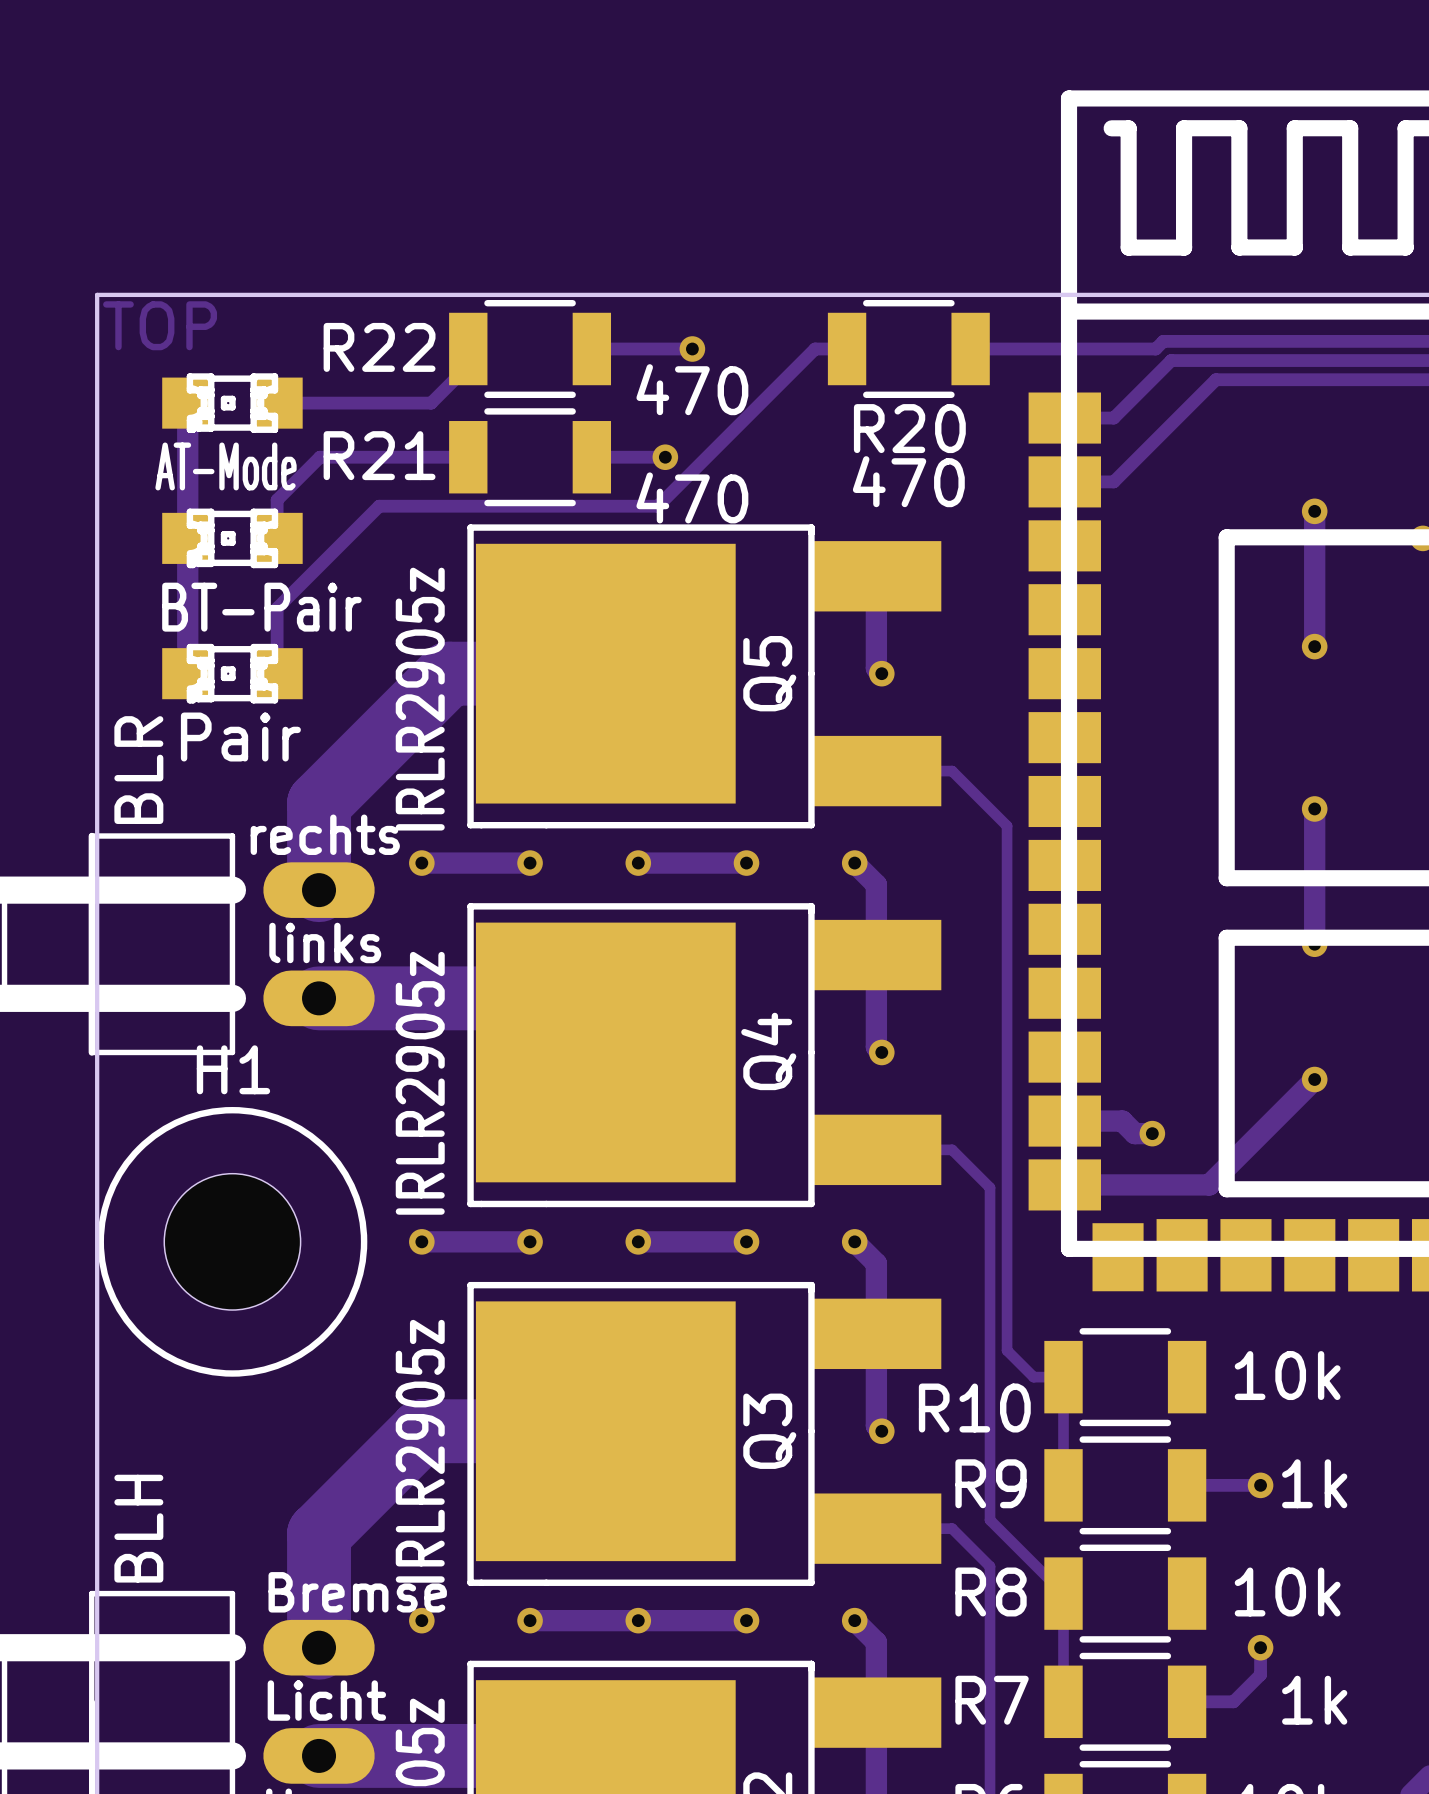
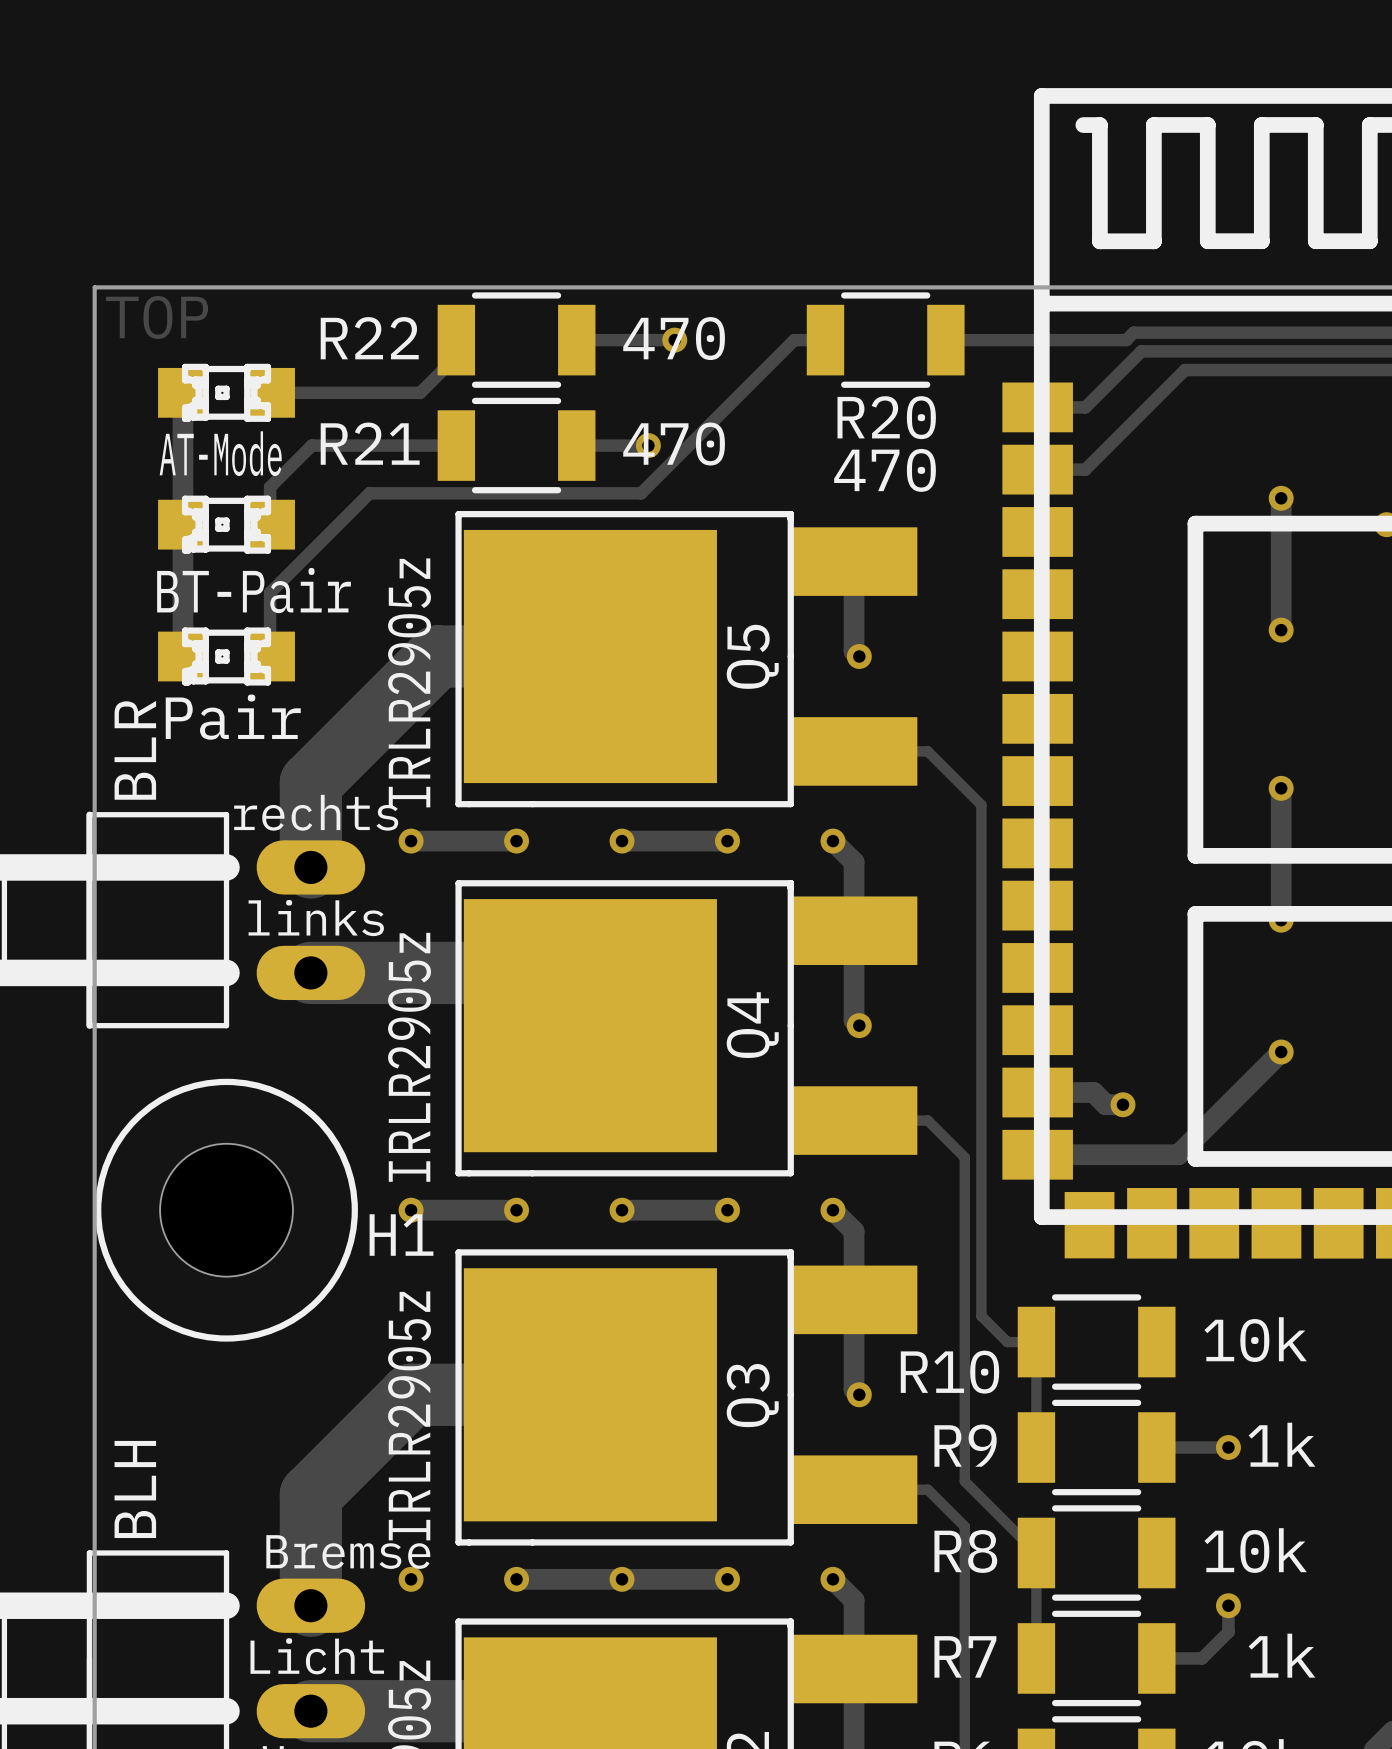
R22 value position: 470 (692, 389) -> 470 (674, 338)
R21 value position: 470 (692, 497) -> 470 (674, 444)
H1 name position: H1 (233, 1069) -> H1 (401, 1235)

